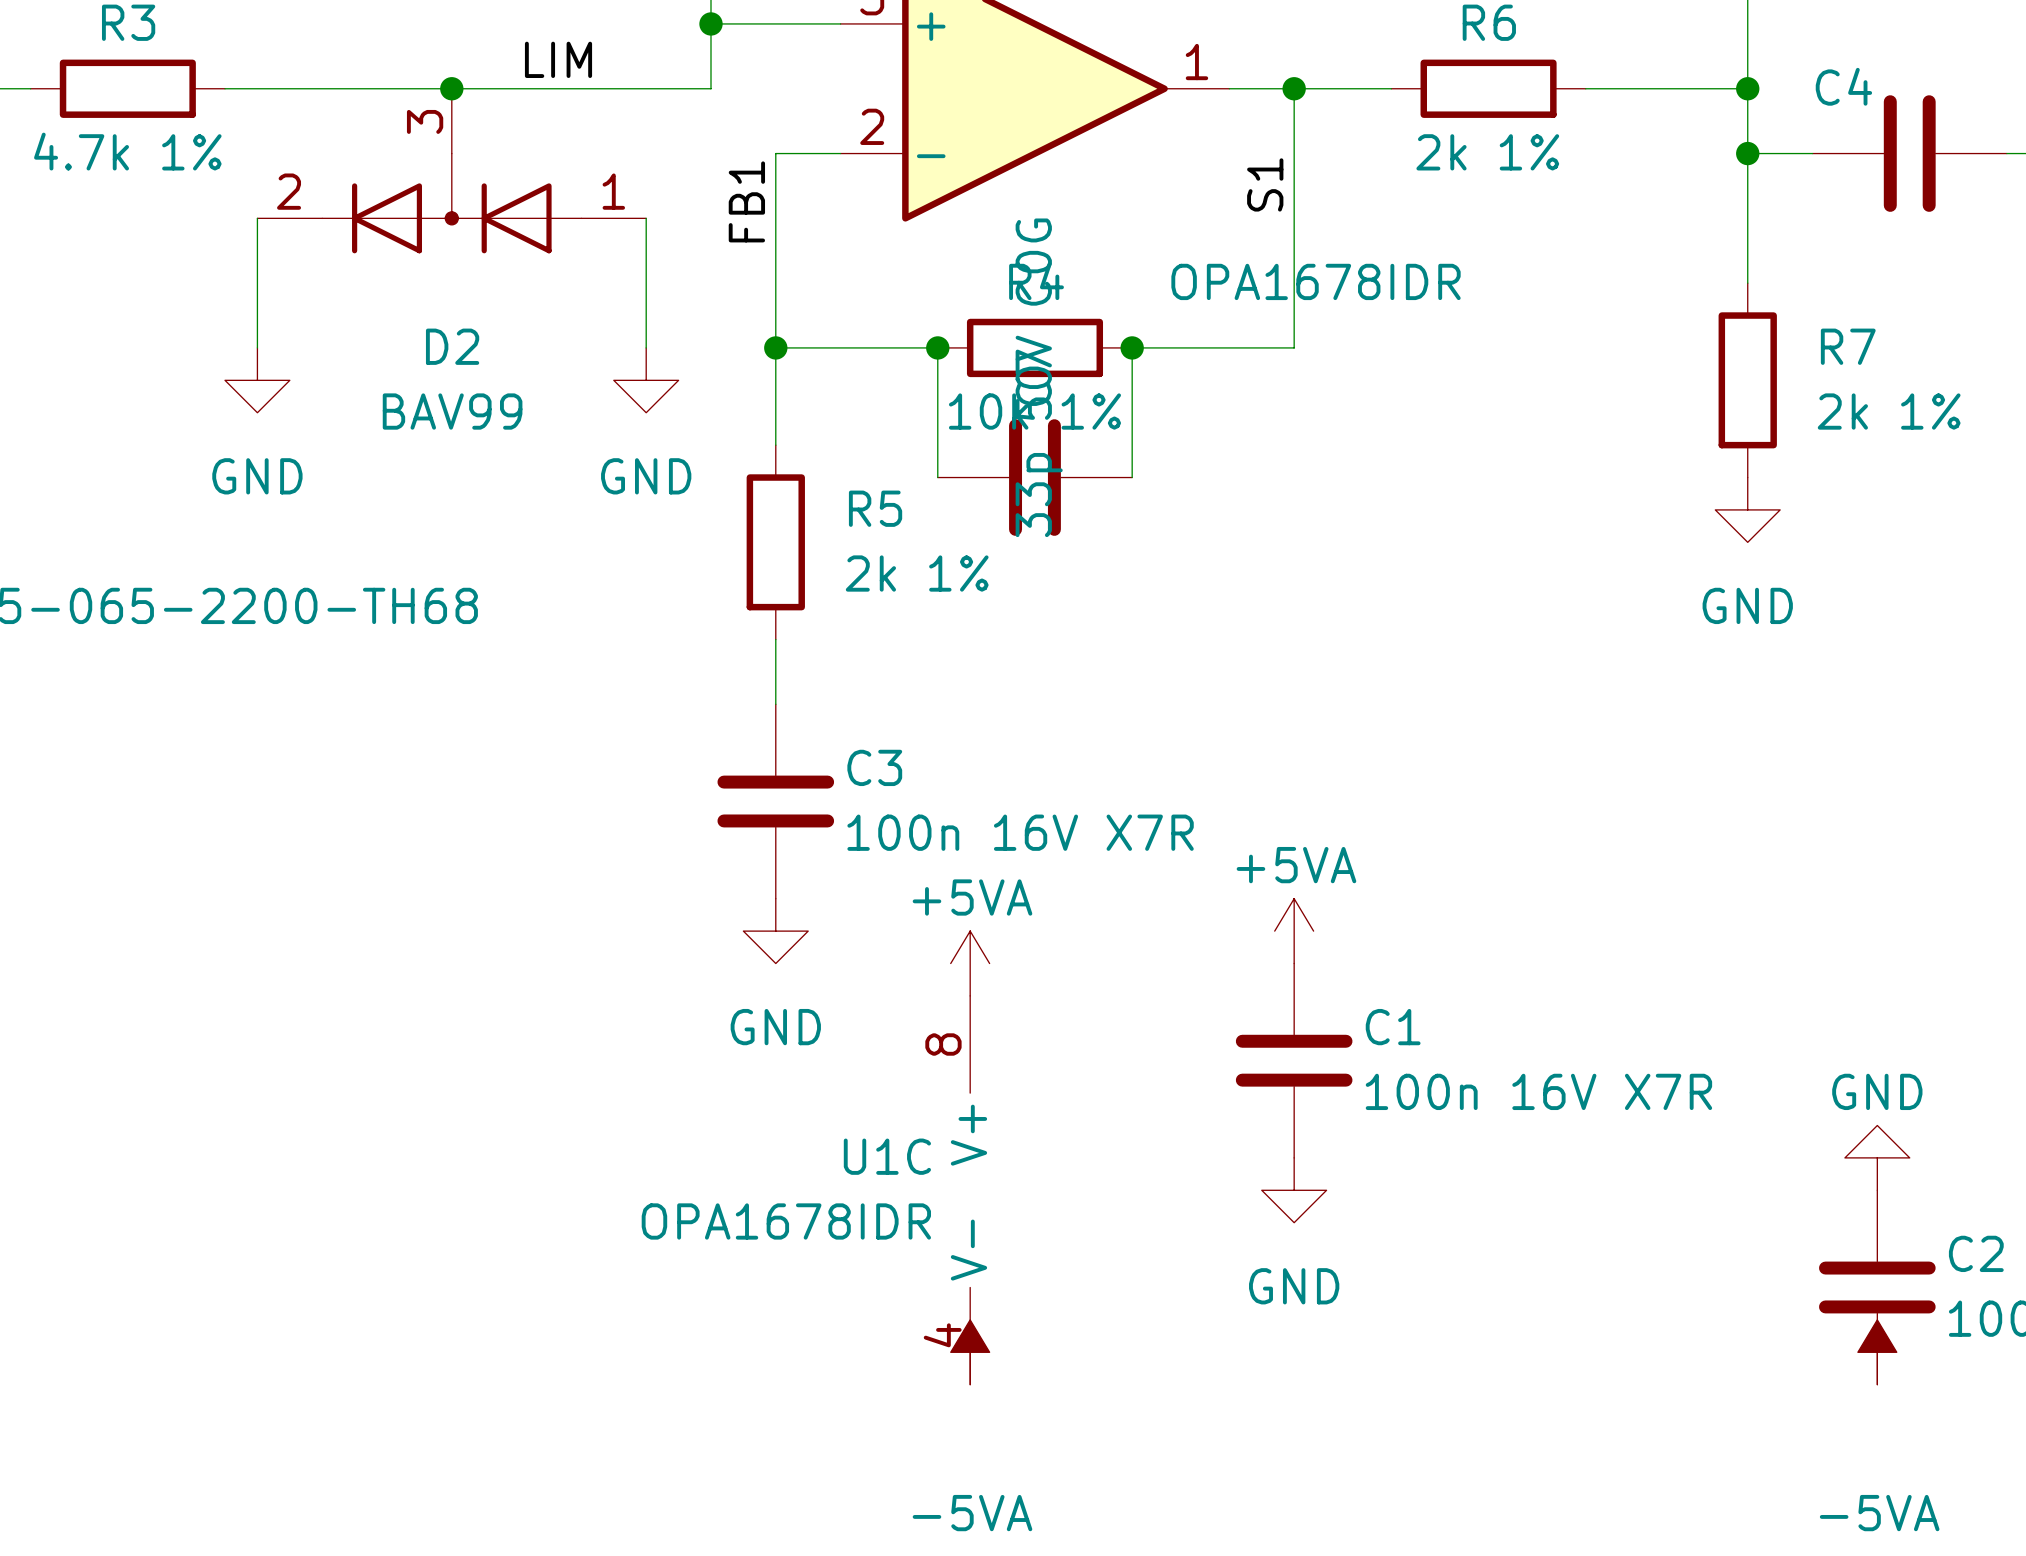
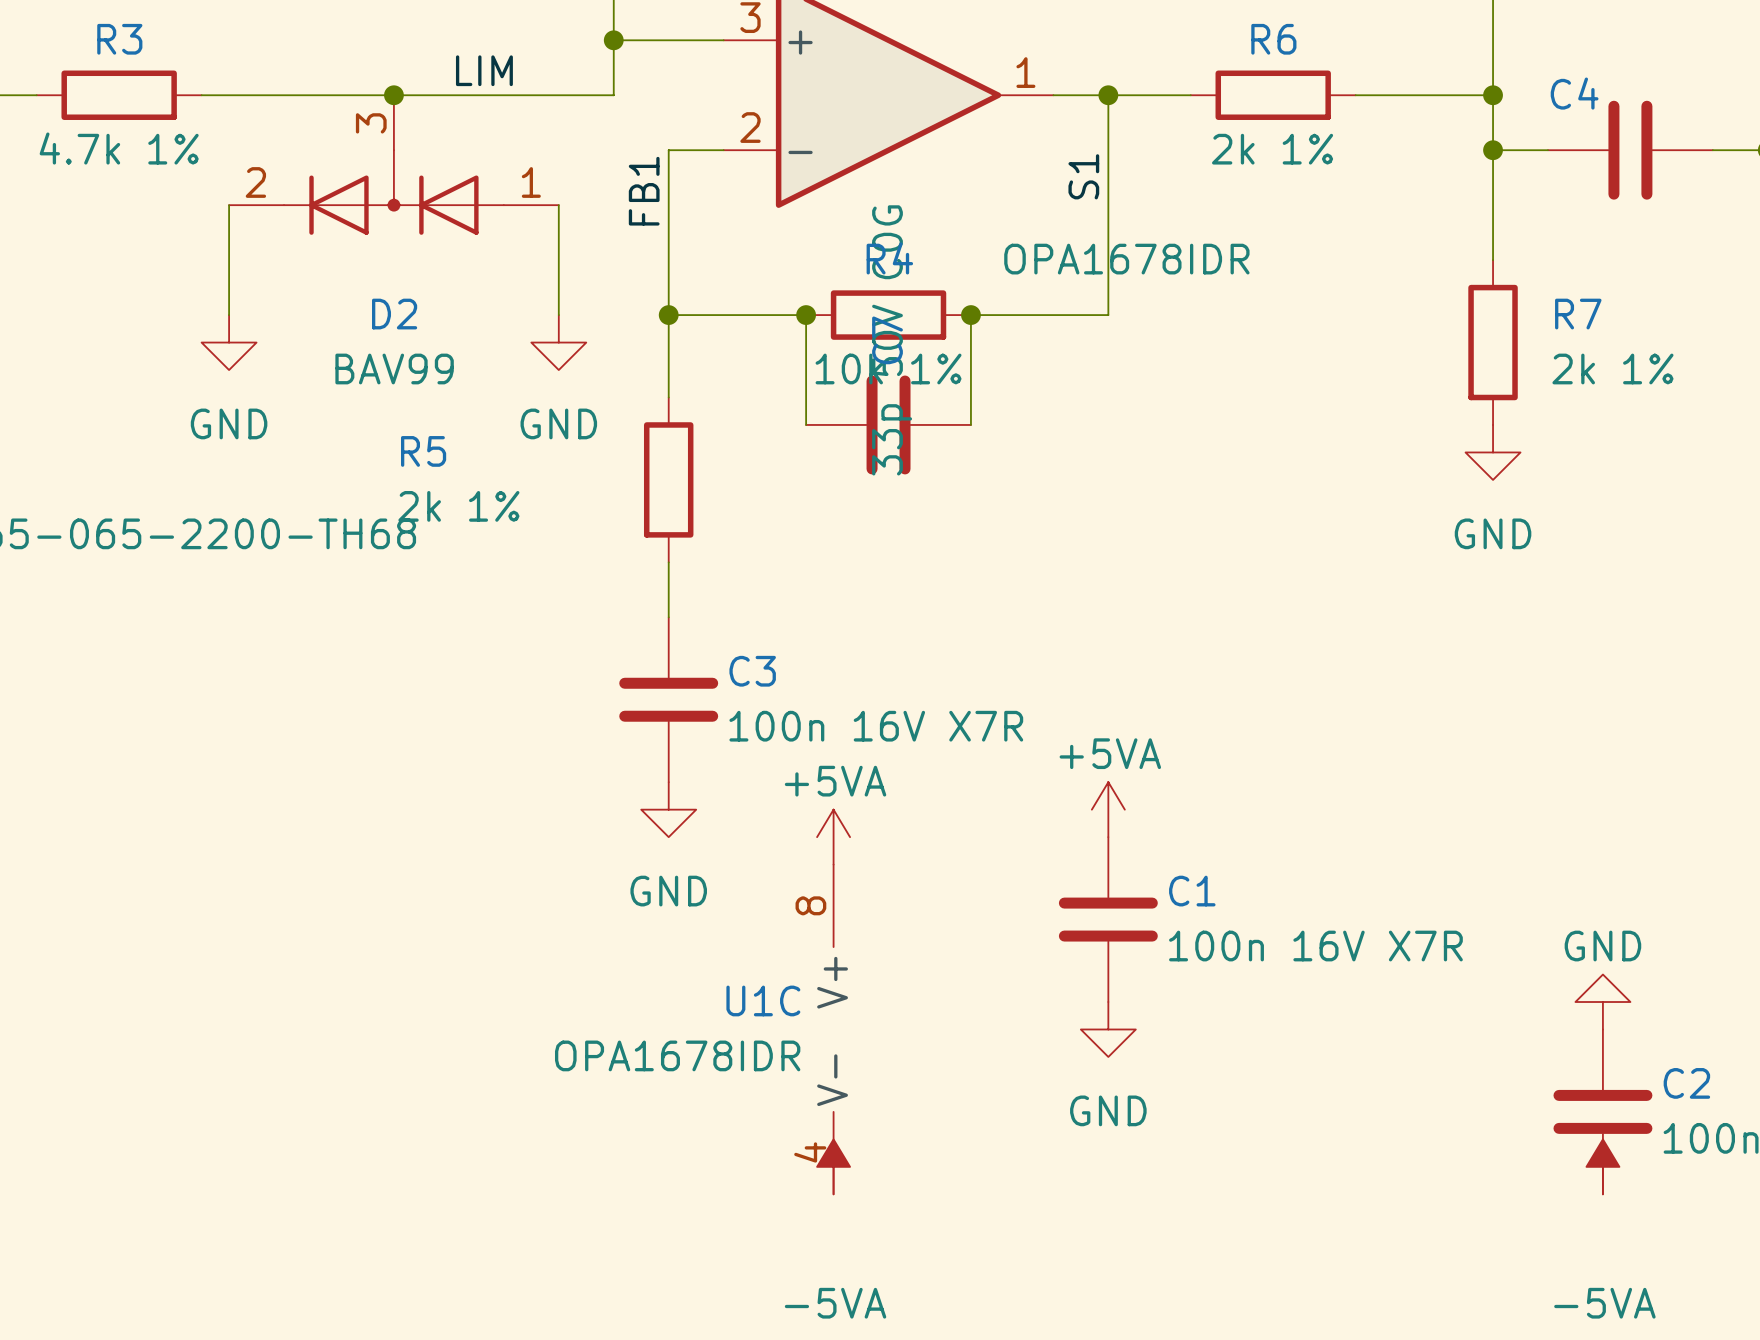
R5 name position: R5 (875, 508) -> R5 (423, 451)
R5 value position: 2k 1% (917, 573) -> 2k 1% (458, 506)

